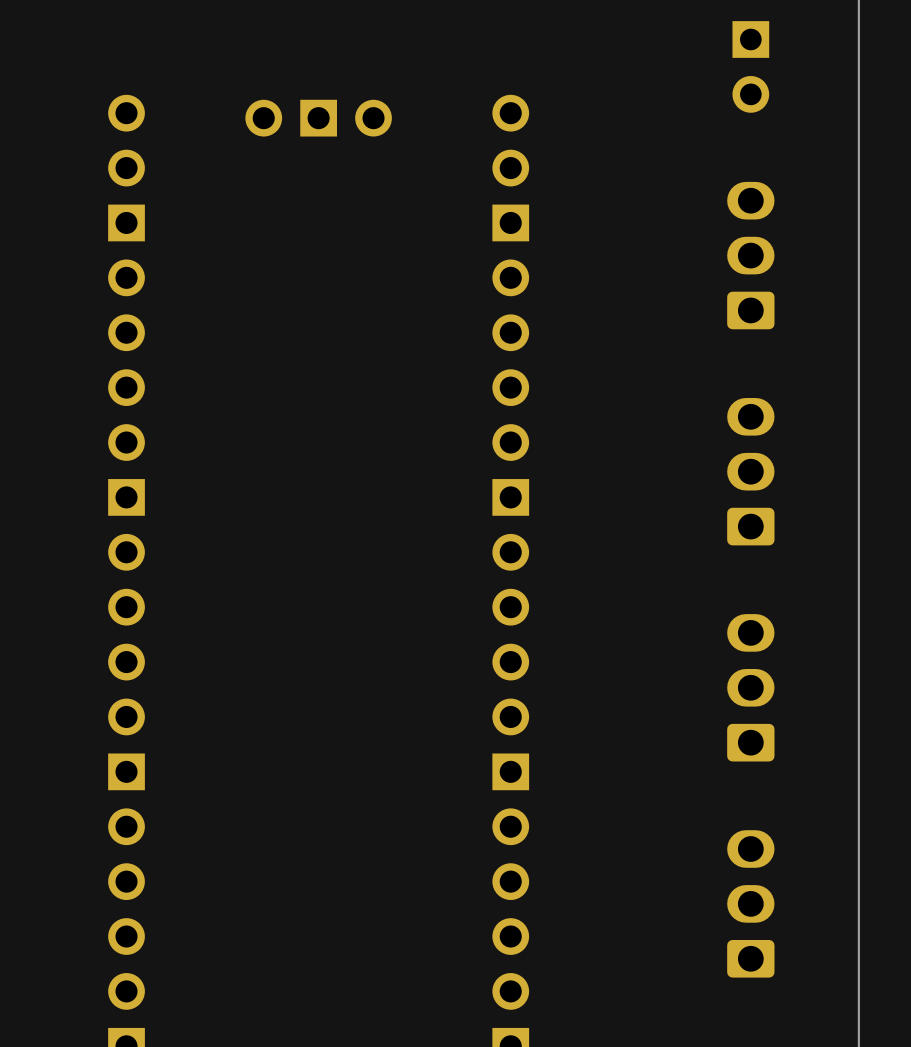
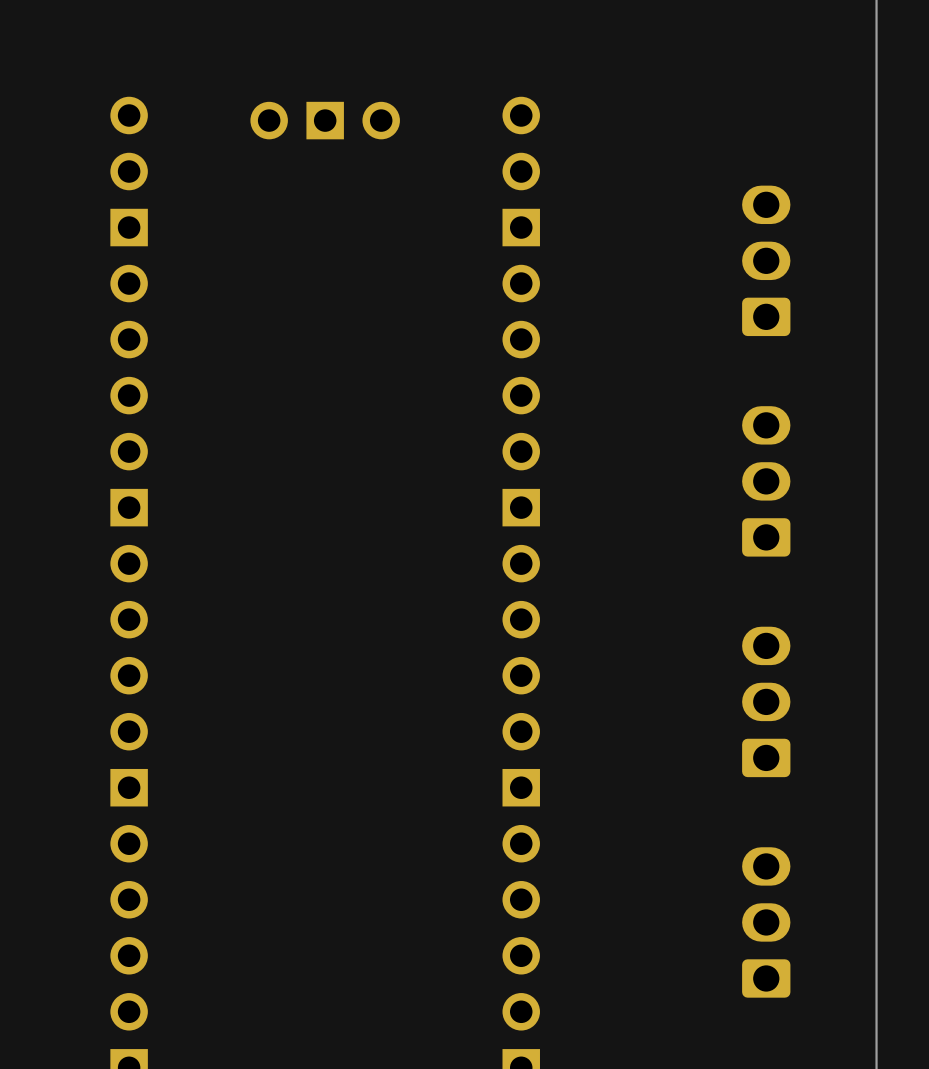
part: (750, 66) -> none

